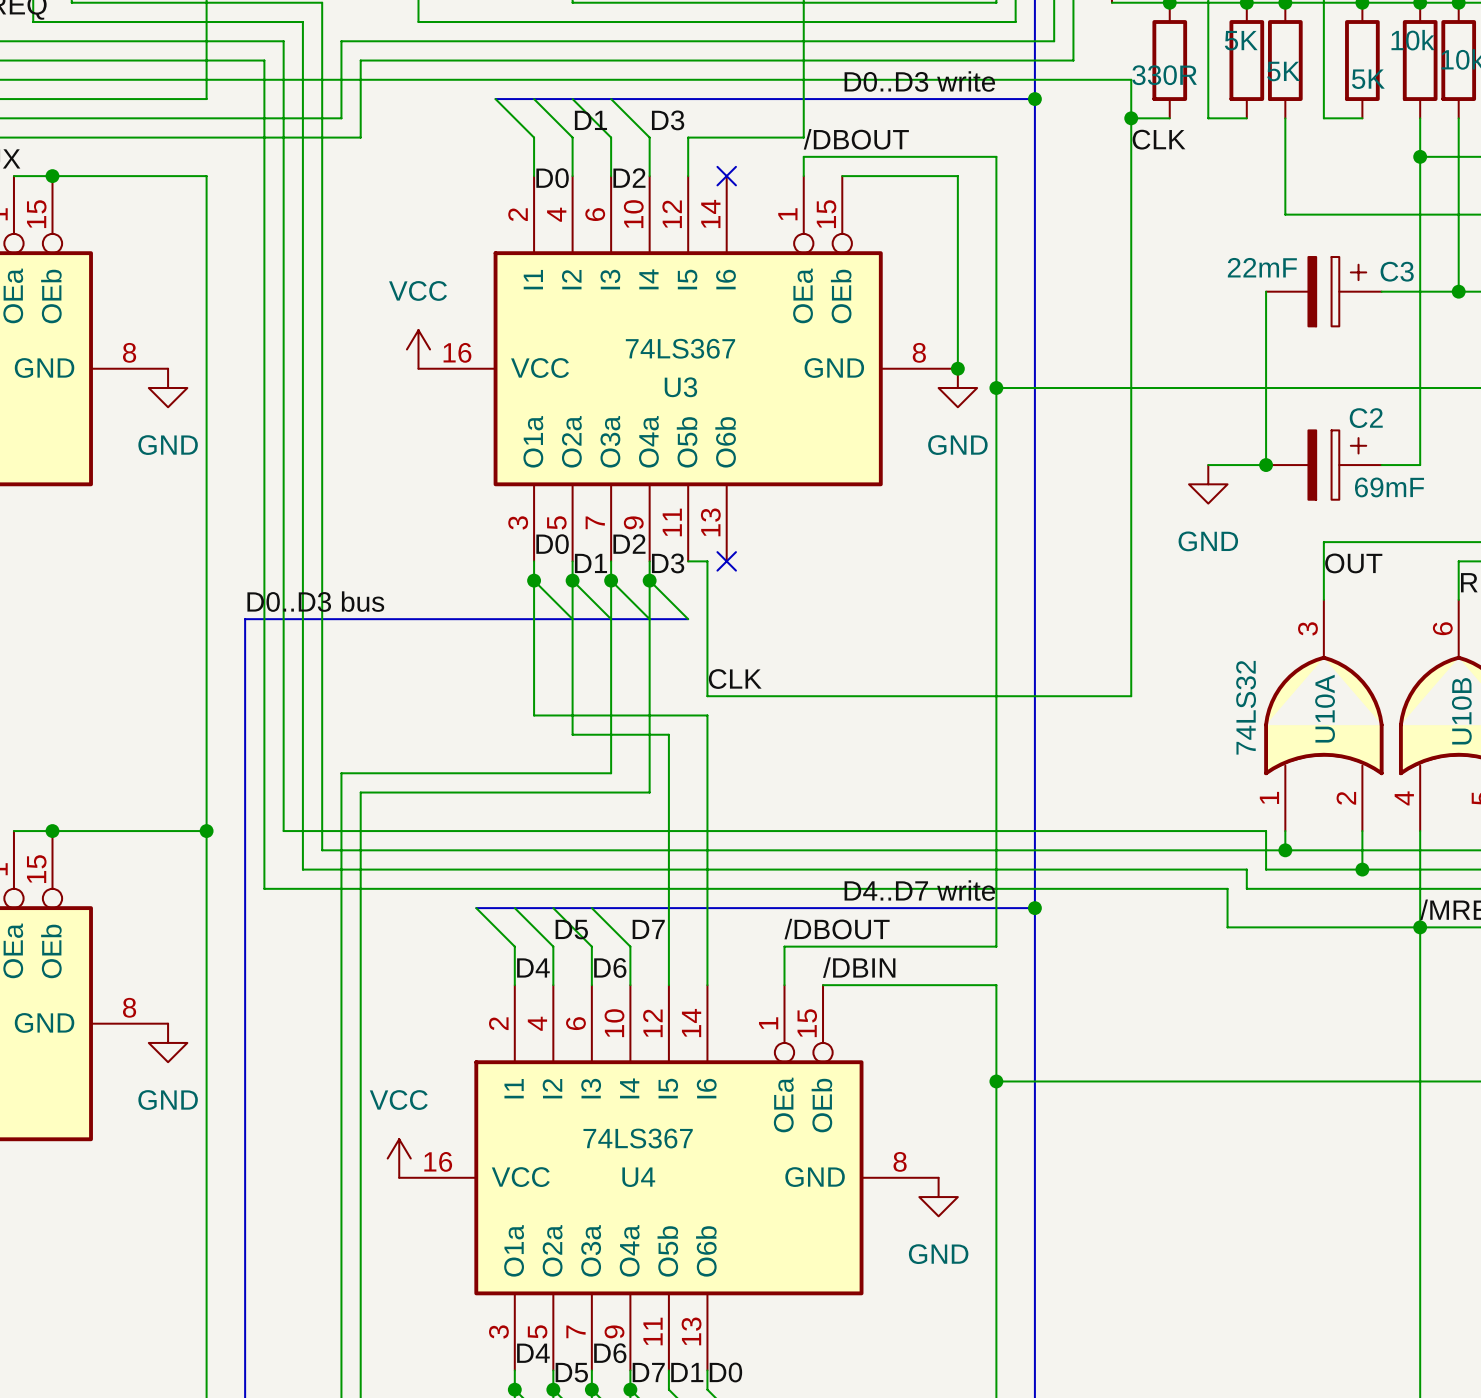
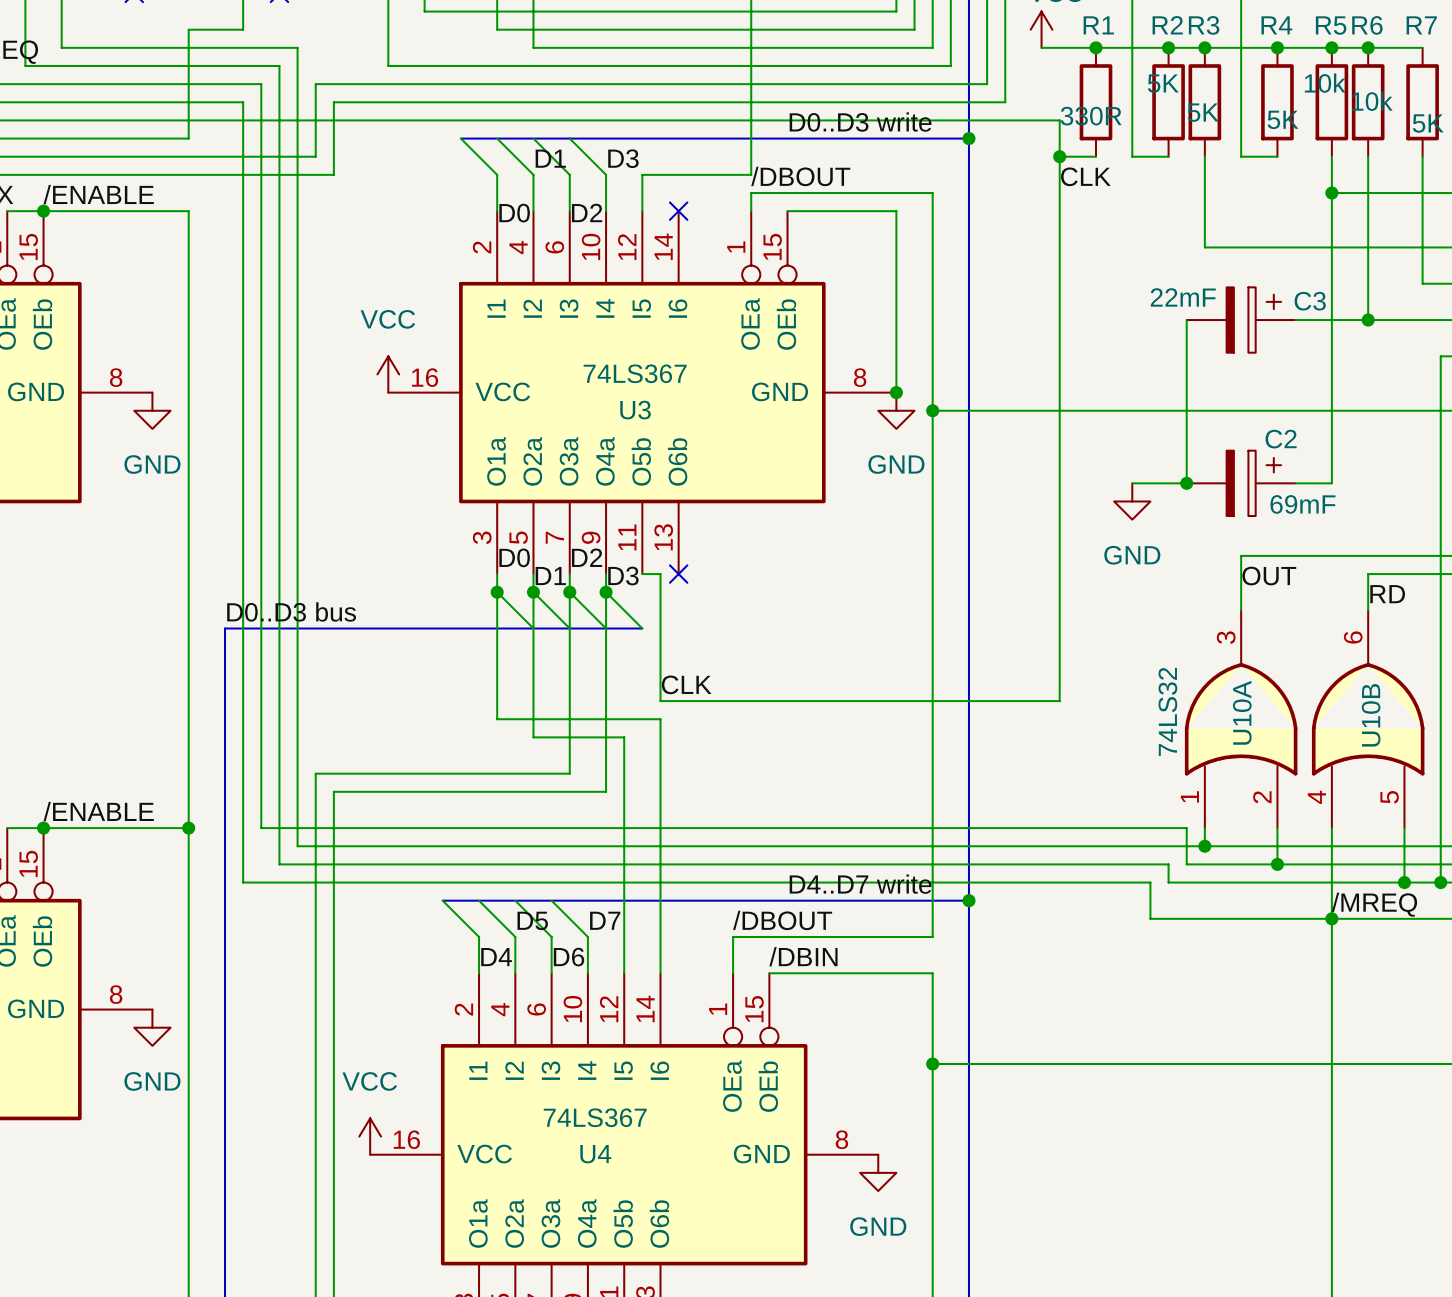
label: none -> /ENABLE (98, 194)
label: none -> /ENABLE (98, 811)

